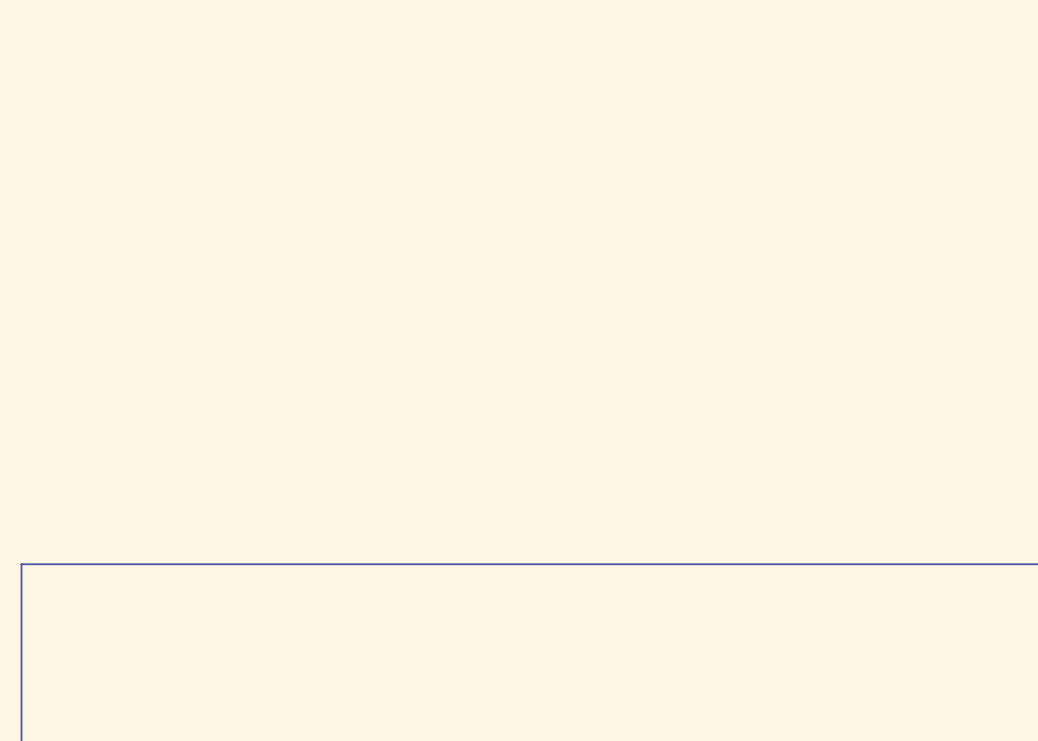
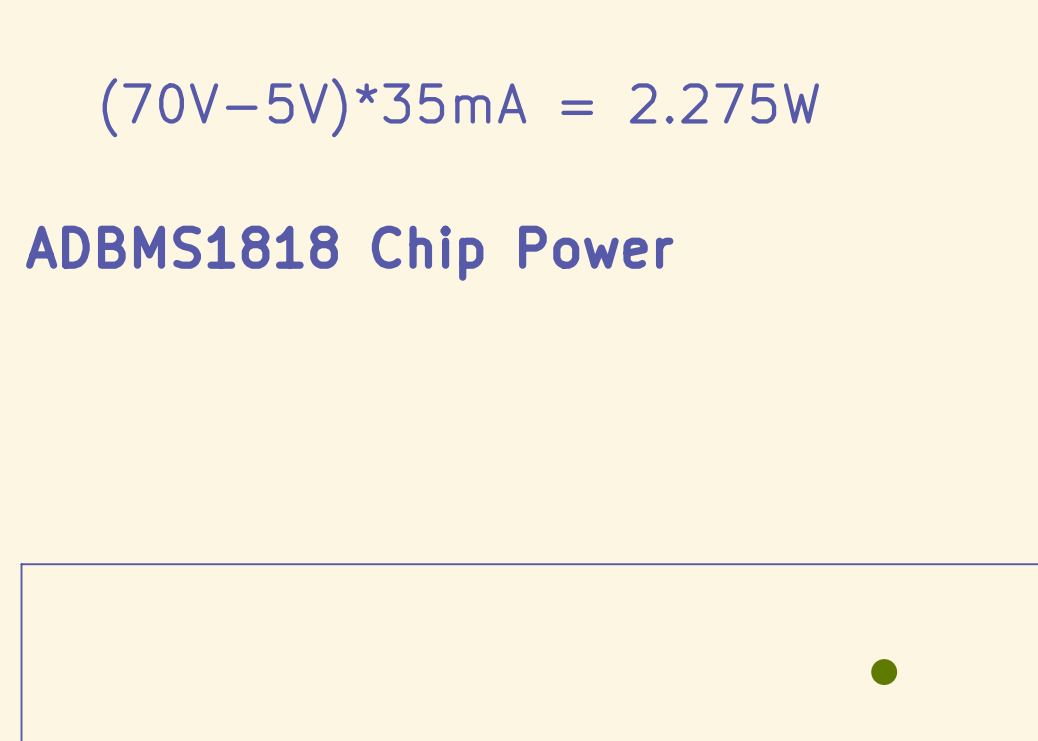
text: none -> (70V-5V)*35mA = 2.275W (460, 107)
text: none -> ADBMS1818 Chip Power (349, 253)
junction: none -> (884, 672)

